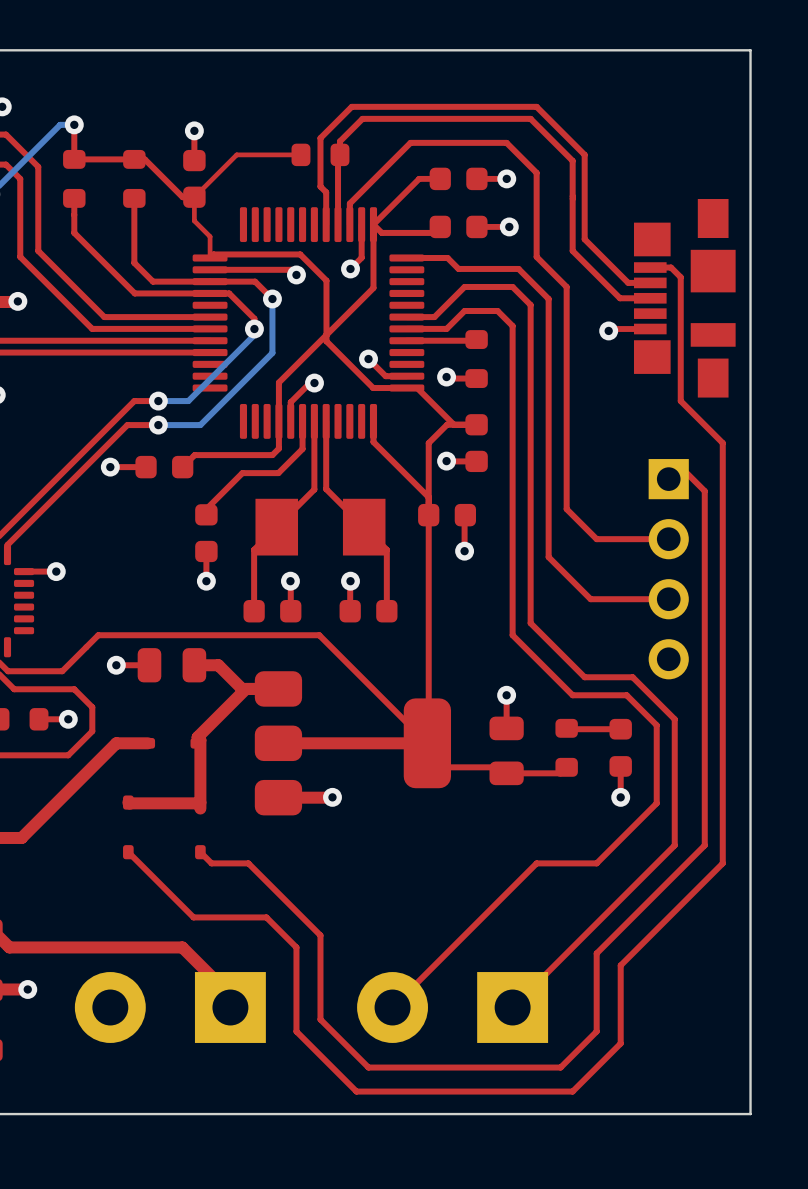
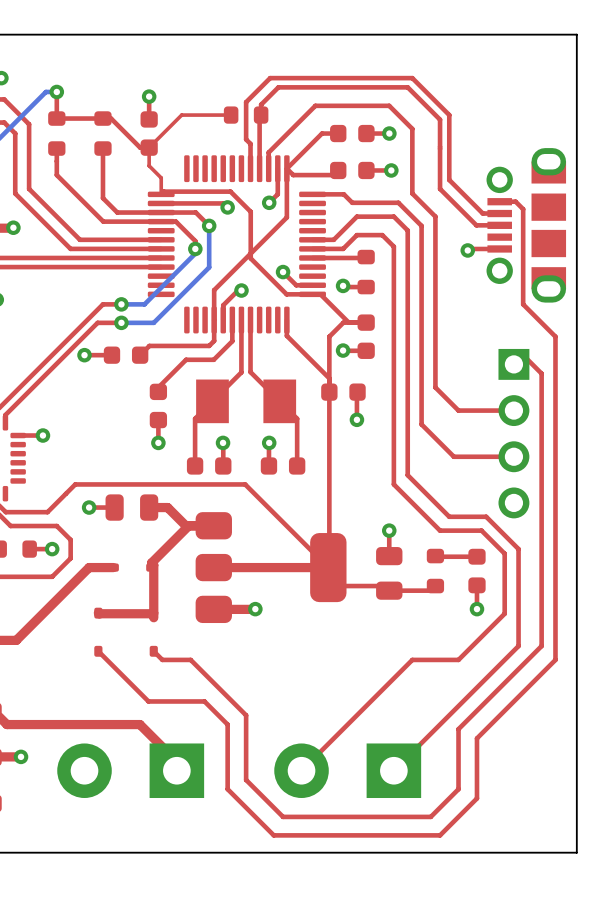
part footprint: [633, 198, 736, 398] -> [486, 148, 567, 303]

